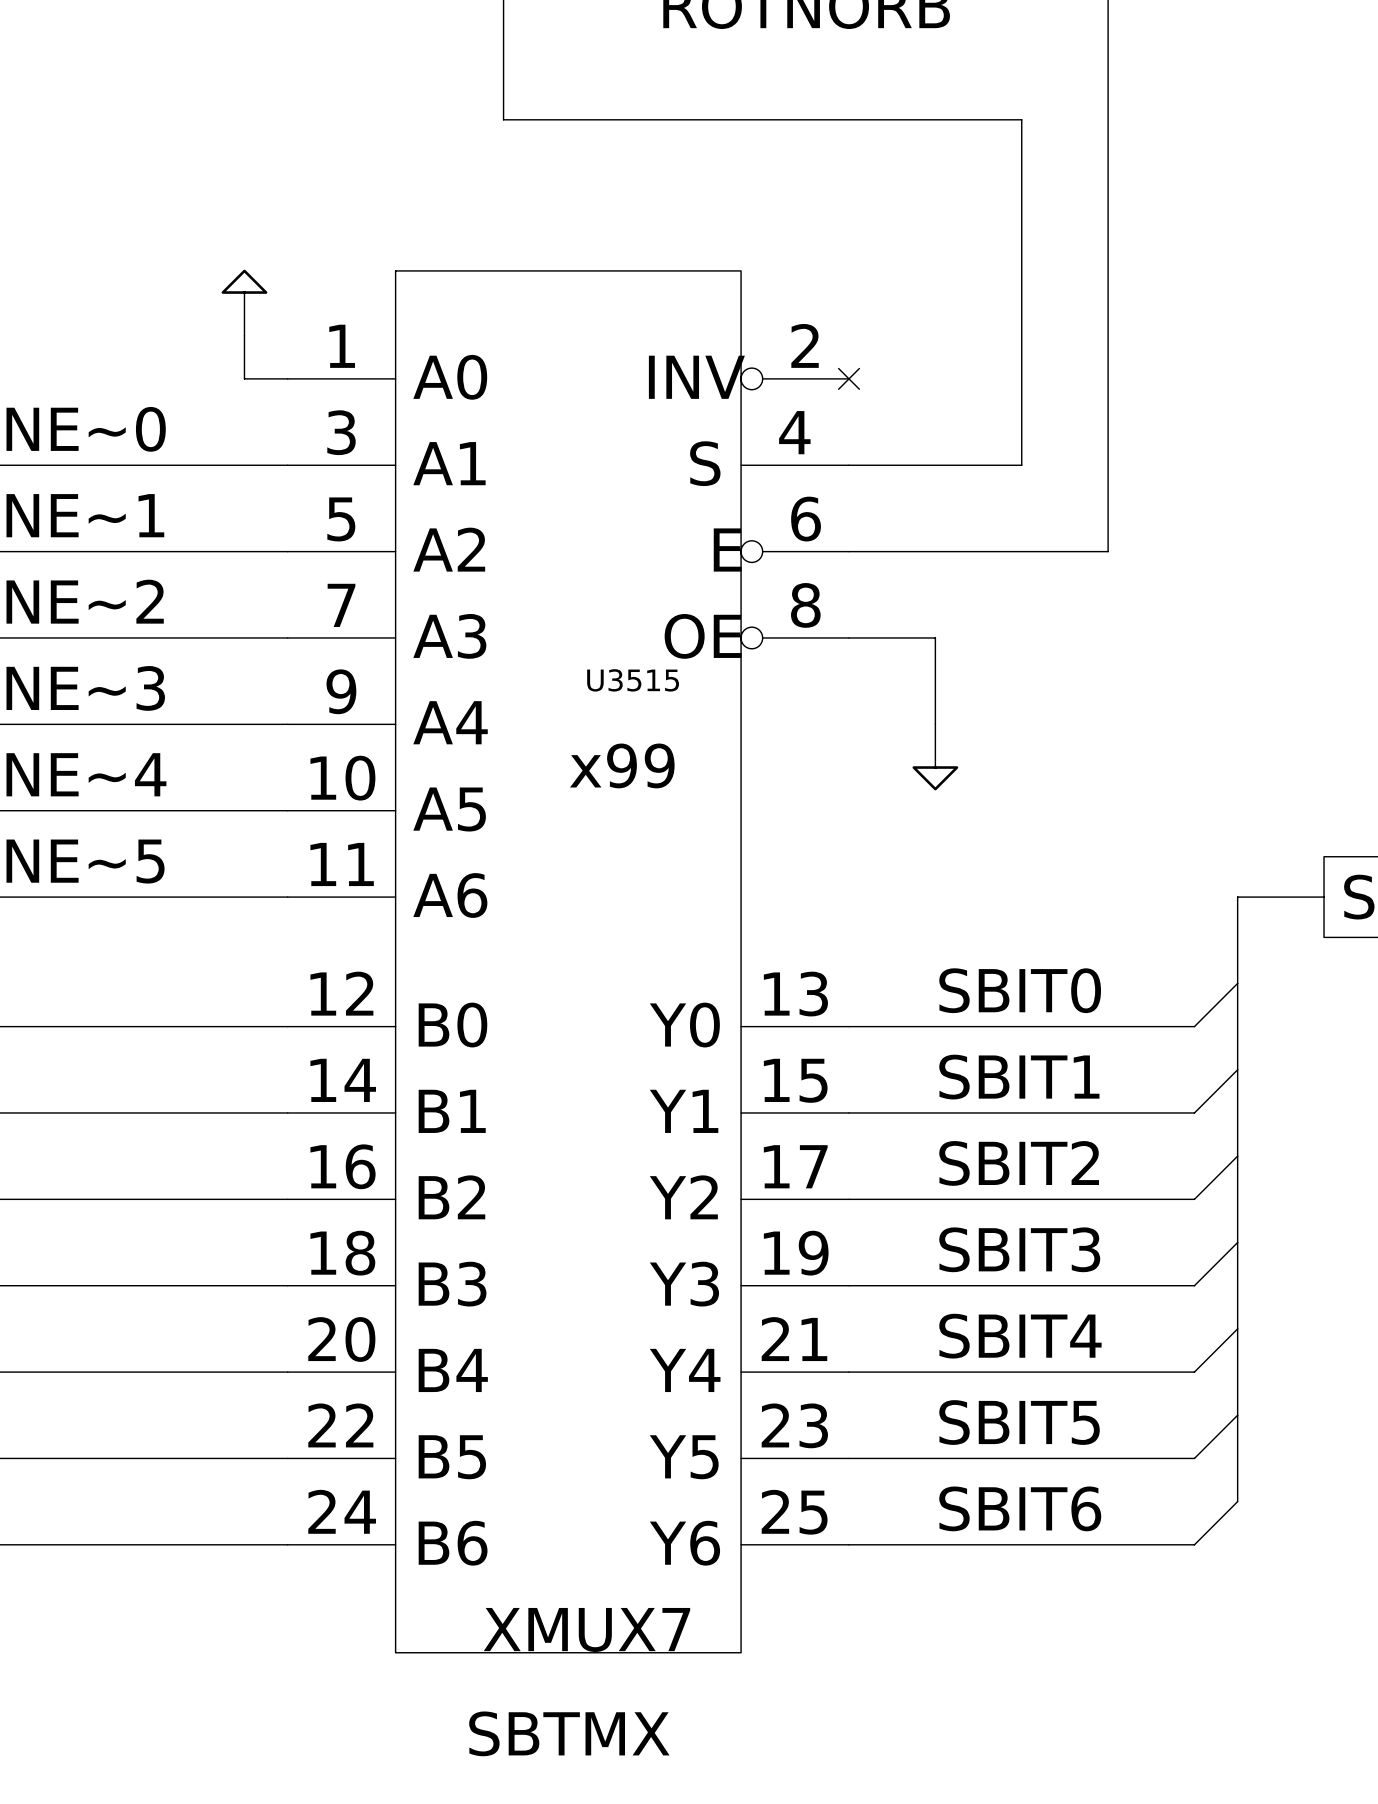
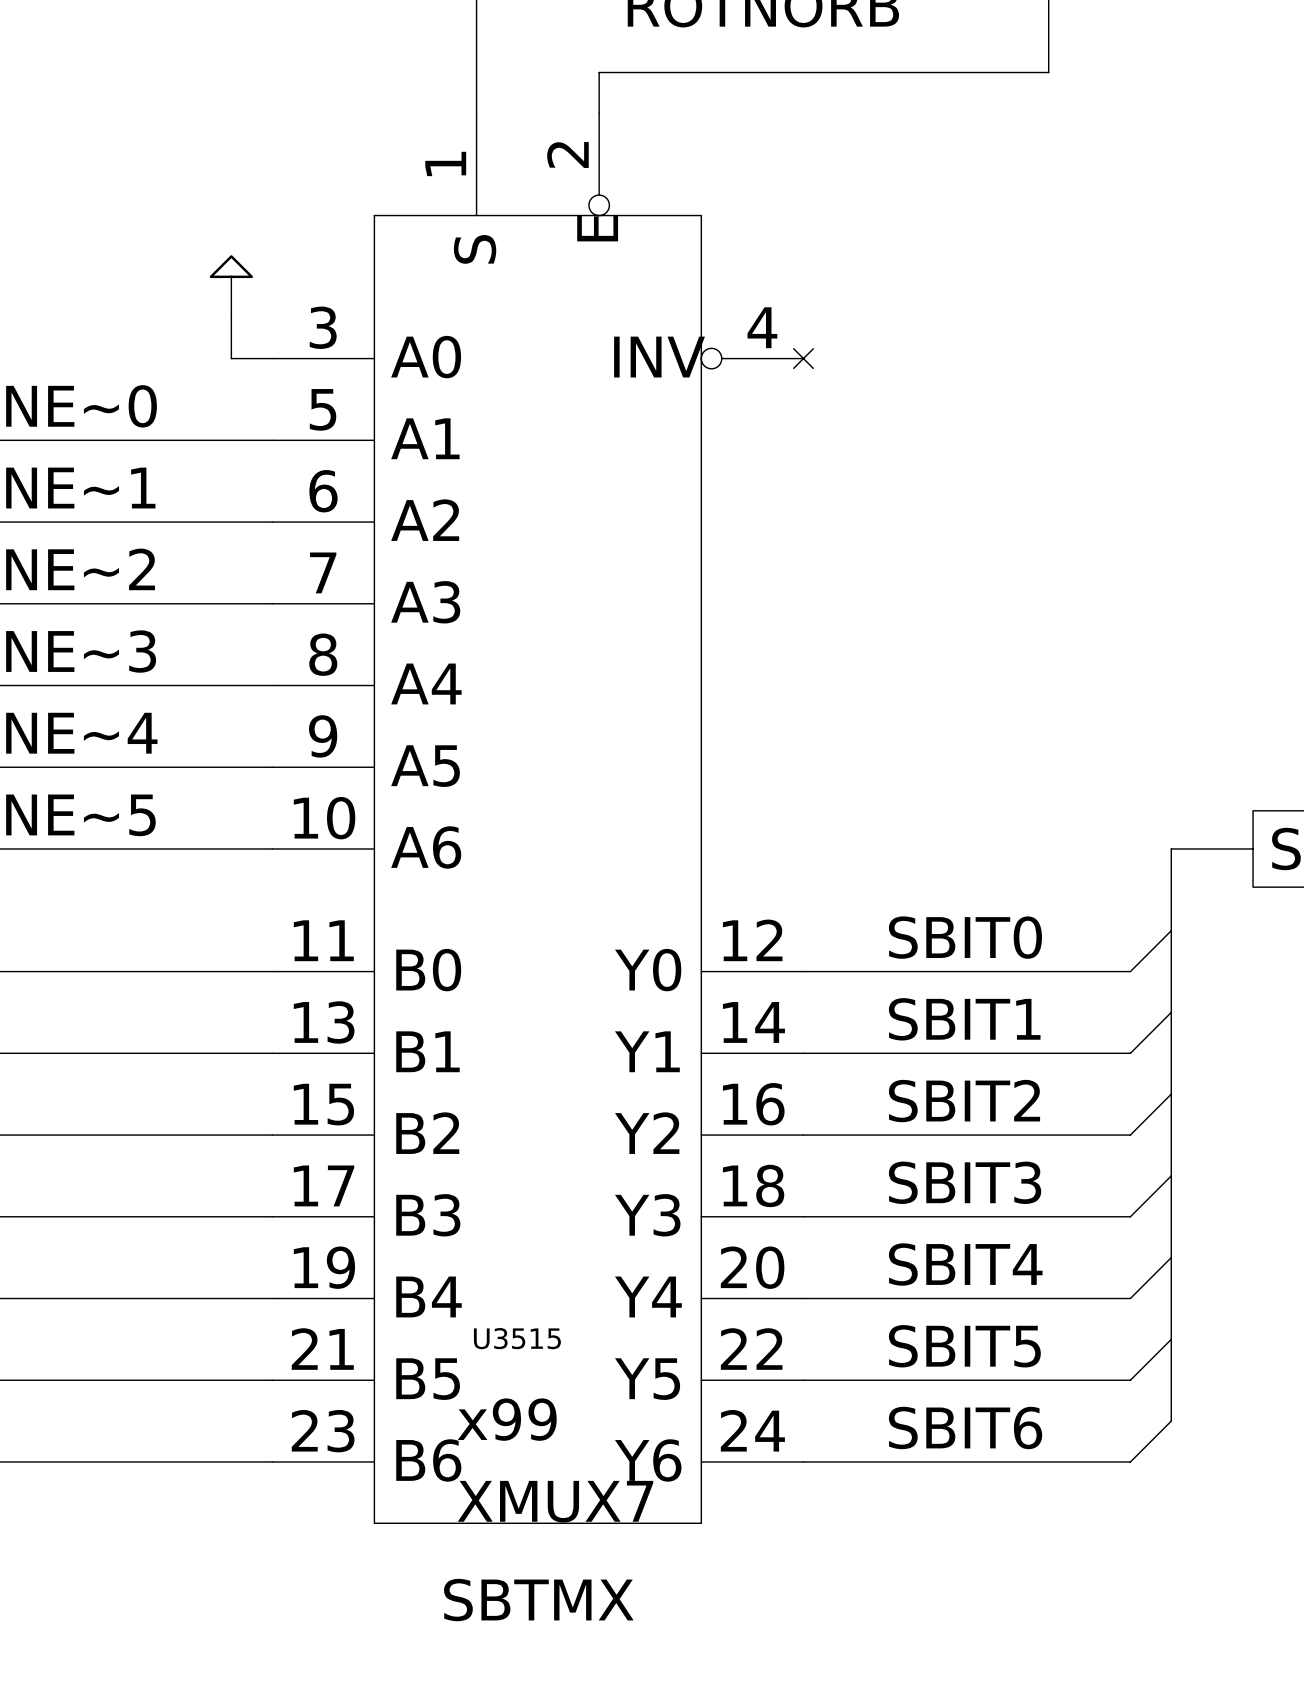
wire: (1108, 76) (1108, 551) (849, 551) -> (1048, 72) (599, 72) (599, 113)
wire: (503, 119) (1021, 119) (1021, 465) (849, 465) -> none
U3515 symbol: [287, 270, 850, 1653] -> [272, 113, 804, 1524]
wire: (849, 637) (935, 637) (935, 724) -> none
U3515 name position: U3515 (633, 680) -> U3515 (517, 1338)
power symbol: (935, 757) -> none
U3515 text position: x99 (622, 765) -> x99 (507, 1419)
U3515 value position: XMUX7 (586, 1629) -> XMUX7 (555, 1501)
U3515 text position: SBTMX (569, 1733) -> SBTMX (538, 1600)

